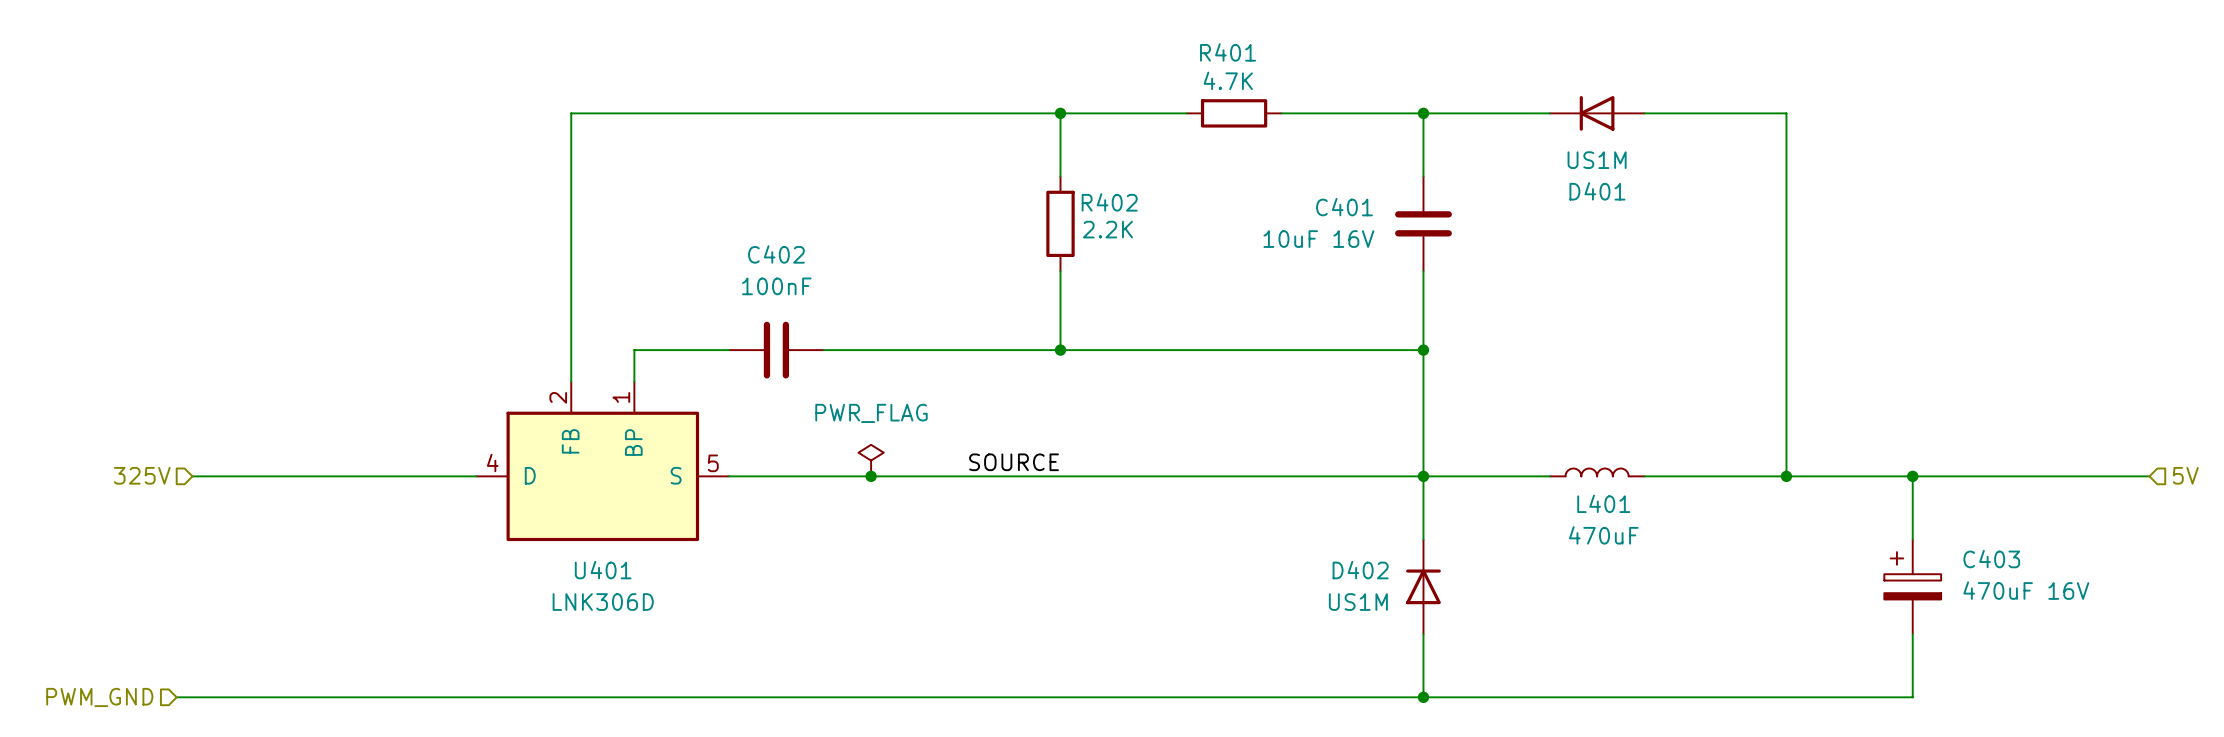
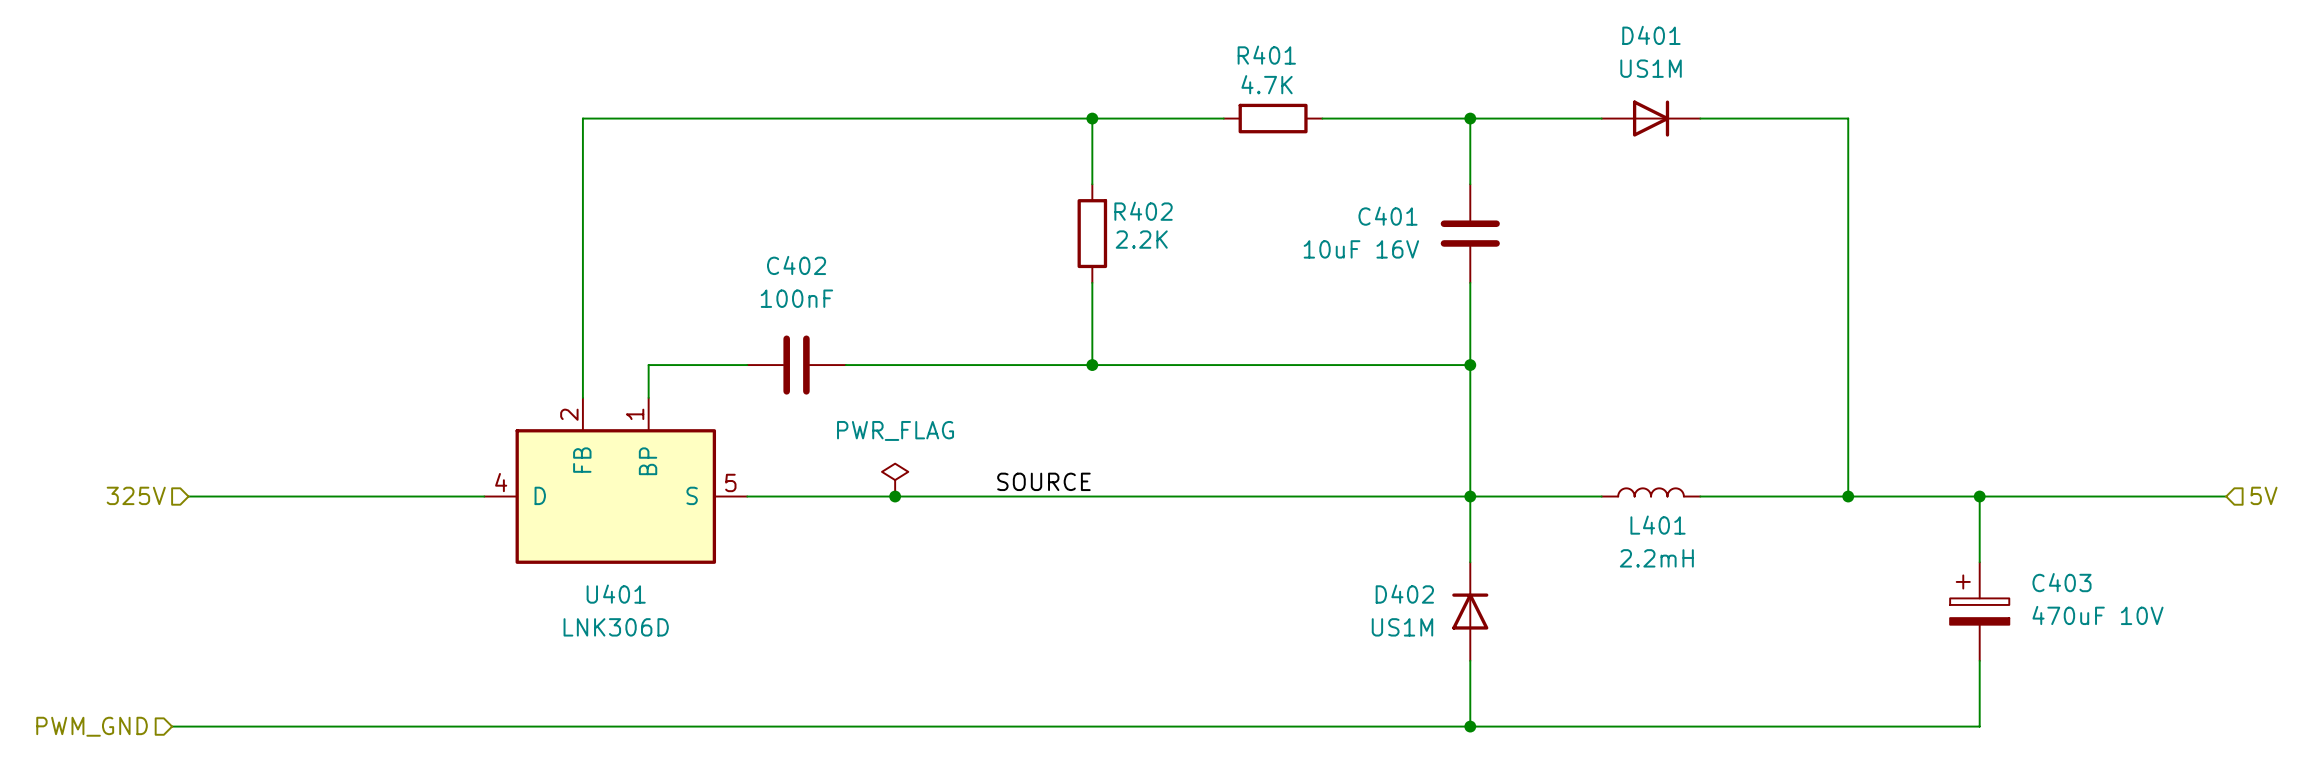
D401 rotation: 0° (1597, 113) -> 180° (1651, 118)
L401 value: 470uF (1603, 535) -> 2.2mH (1656, 558)
C403 value: 470uF 16V (2026, 590) -> 470uF 10V (2097, 615)

